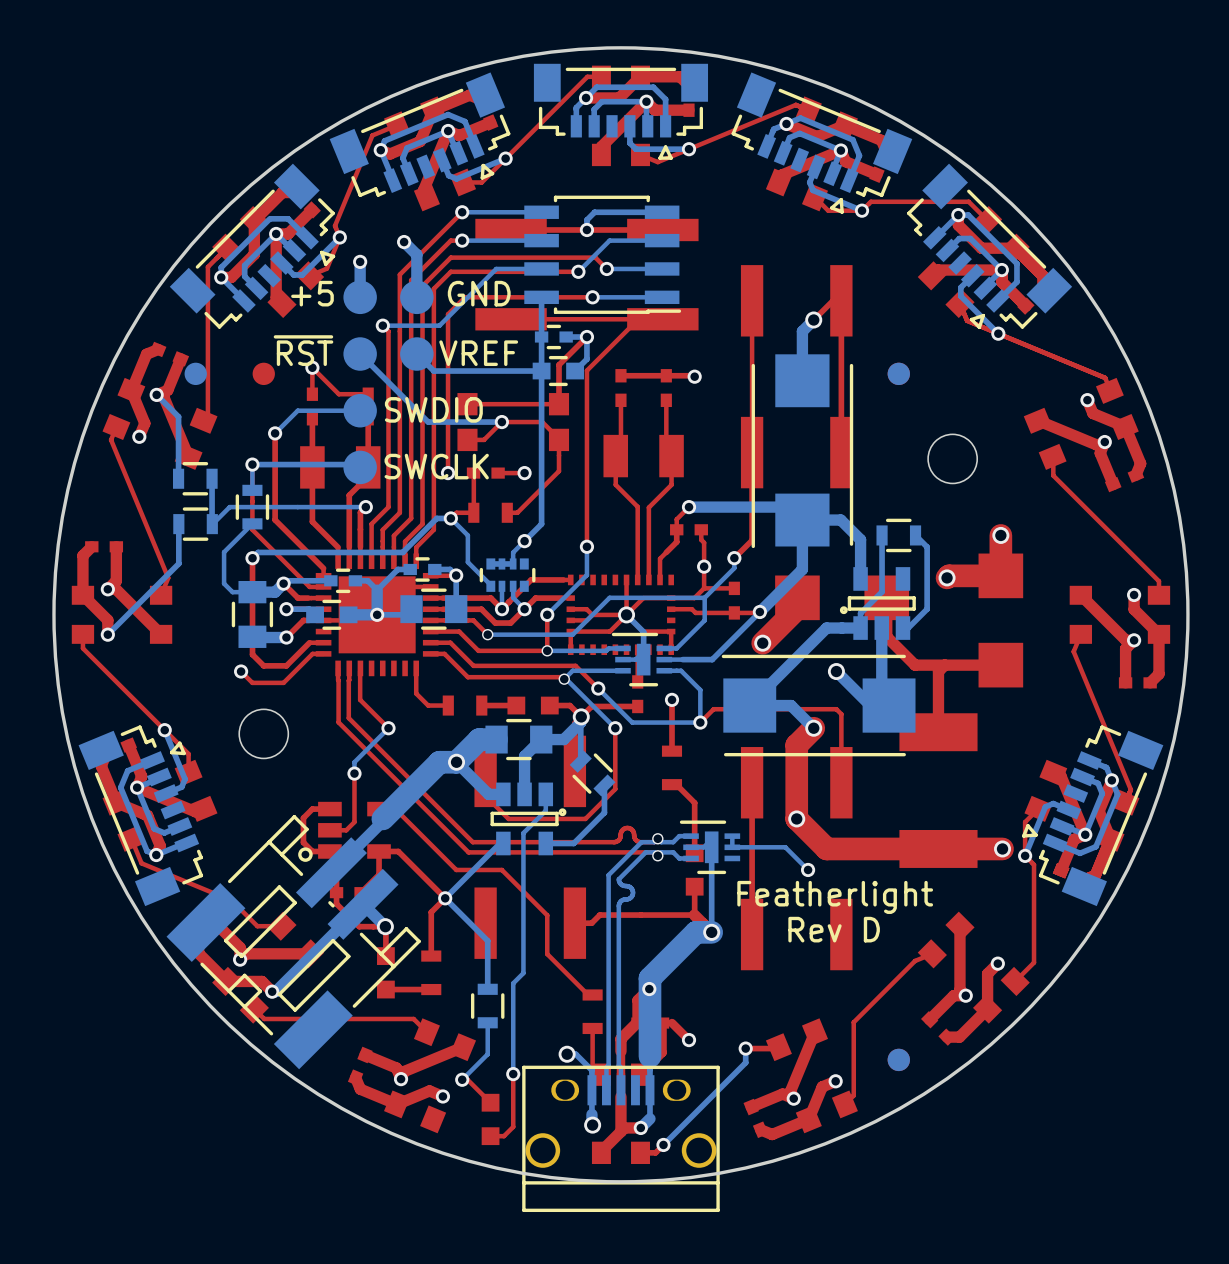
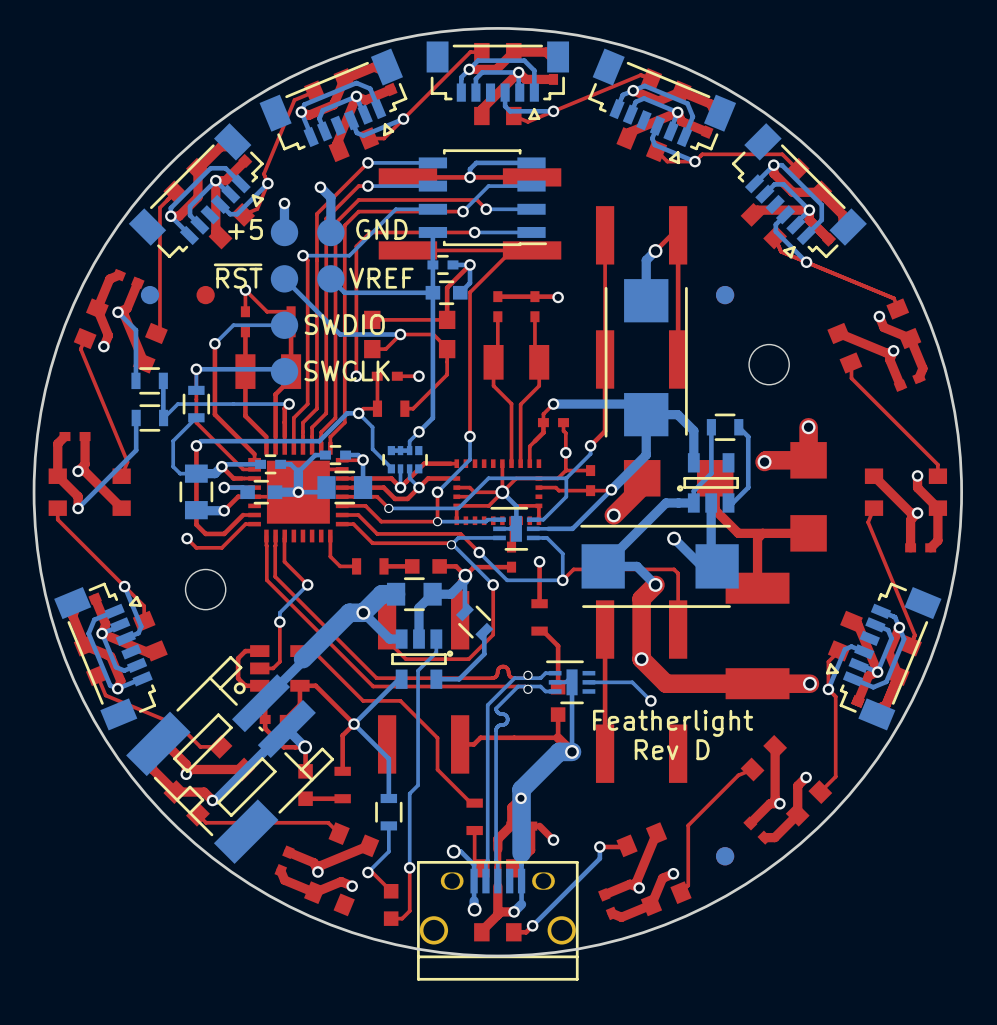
bottom track: (732, 836) (732, 847) -> none

